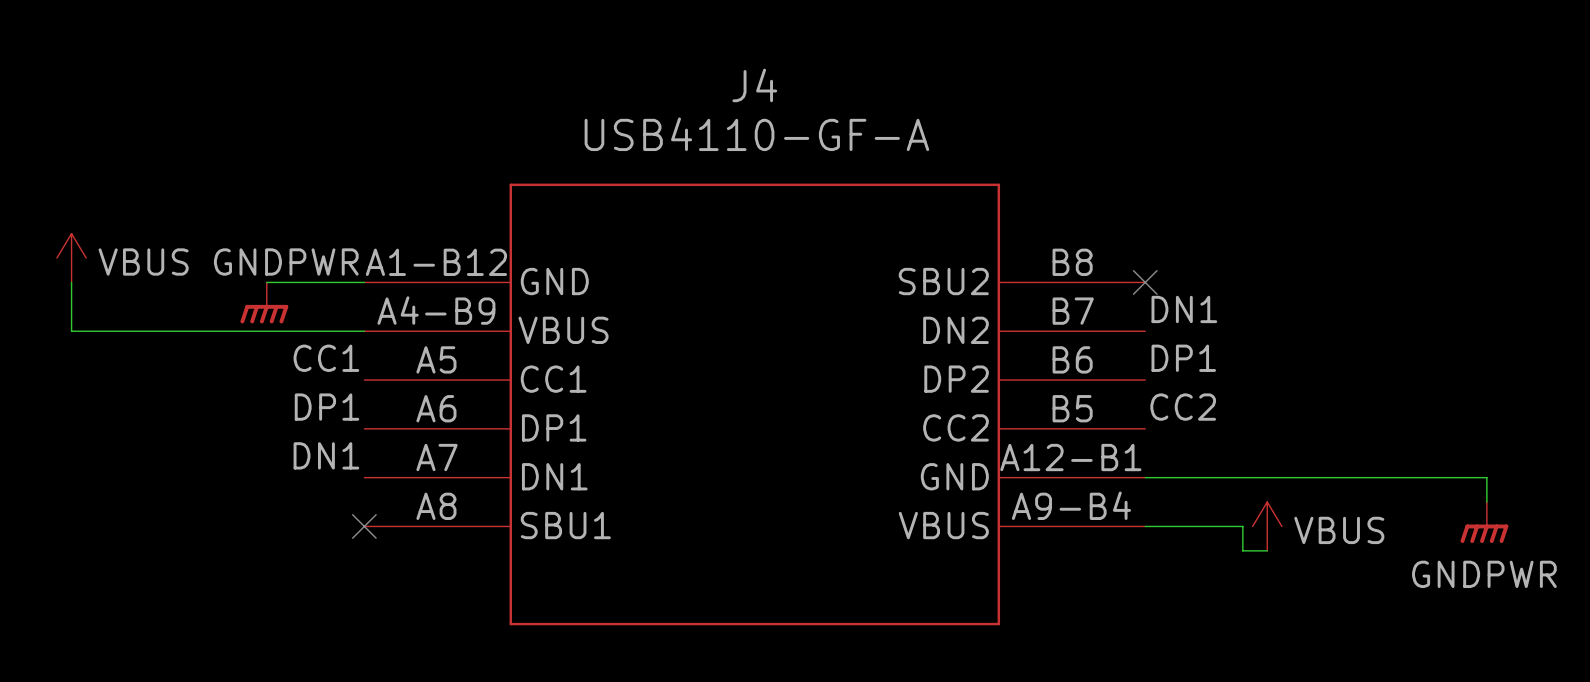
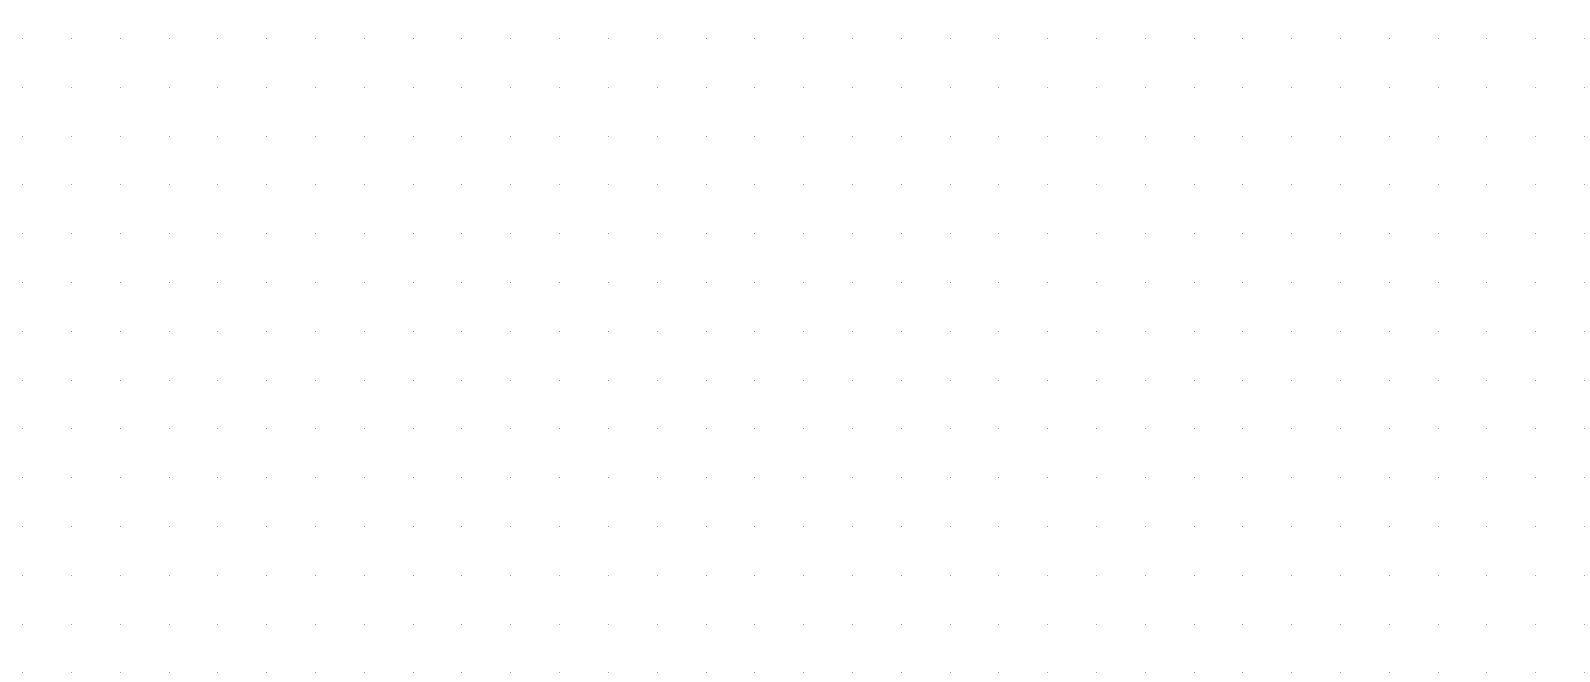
power symbol: VBUS (71, 258) -> none
wire: (71, 282) (71, 331) (364, 331) -> none
wire: (266, 282) (364, 282) -> none
no-connect mark: (1145, 282) -> none
power symbol: GNDPWR (264, 302) -> none
label: DN1 (1184, 309) -> none
label: CC1 (326, 358) -> none
label: DP1 (1183, 358) -> none
J4: USB4110-GF-A (754, 404) -> none
label: DP1 (327, 407) -> none
label: CC2 (1183, 407) -> none
label: DN1 (326, 455) -> none
wire: (1145, 477) (1486, 477) (1486, 502) -> none
power symbol: GNDPWR (1484, 522) -> none
no-connect mark: (364, 526) -> none
wire: (1145, 526) (1242, 526) (1242, 550) (1267, 550) -> none
power symbol: VBUS (1267, 526) -> none

